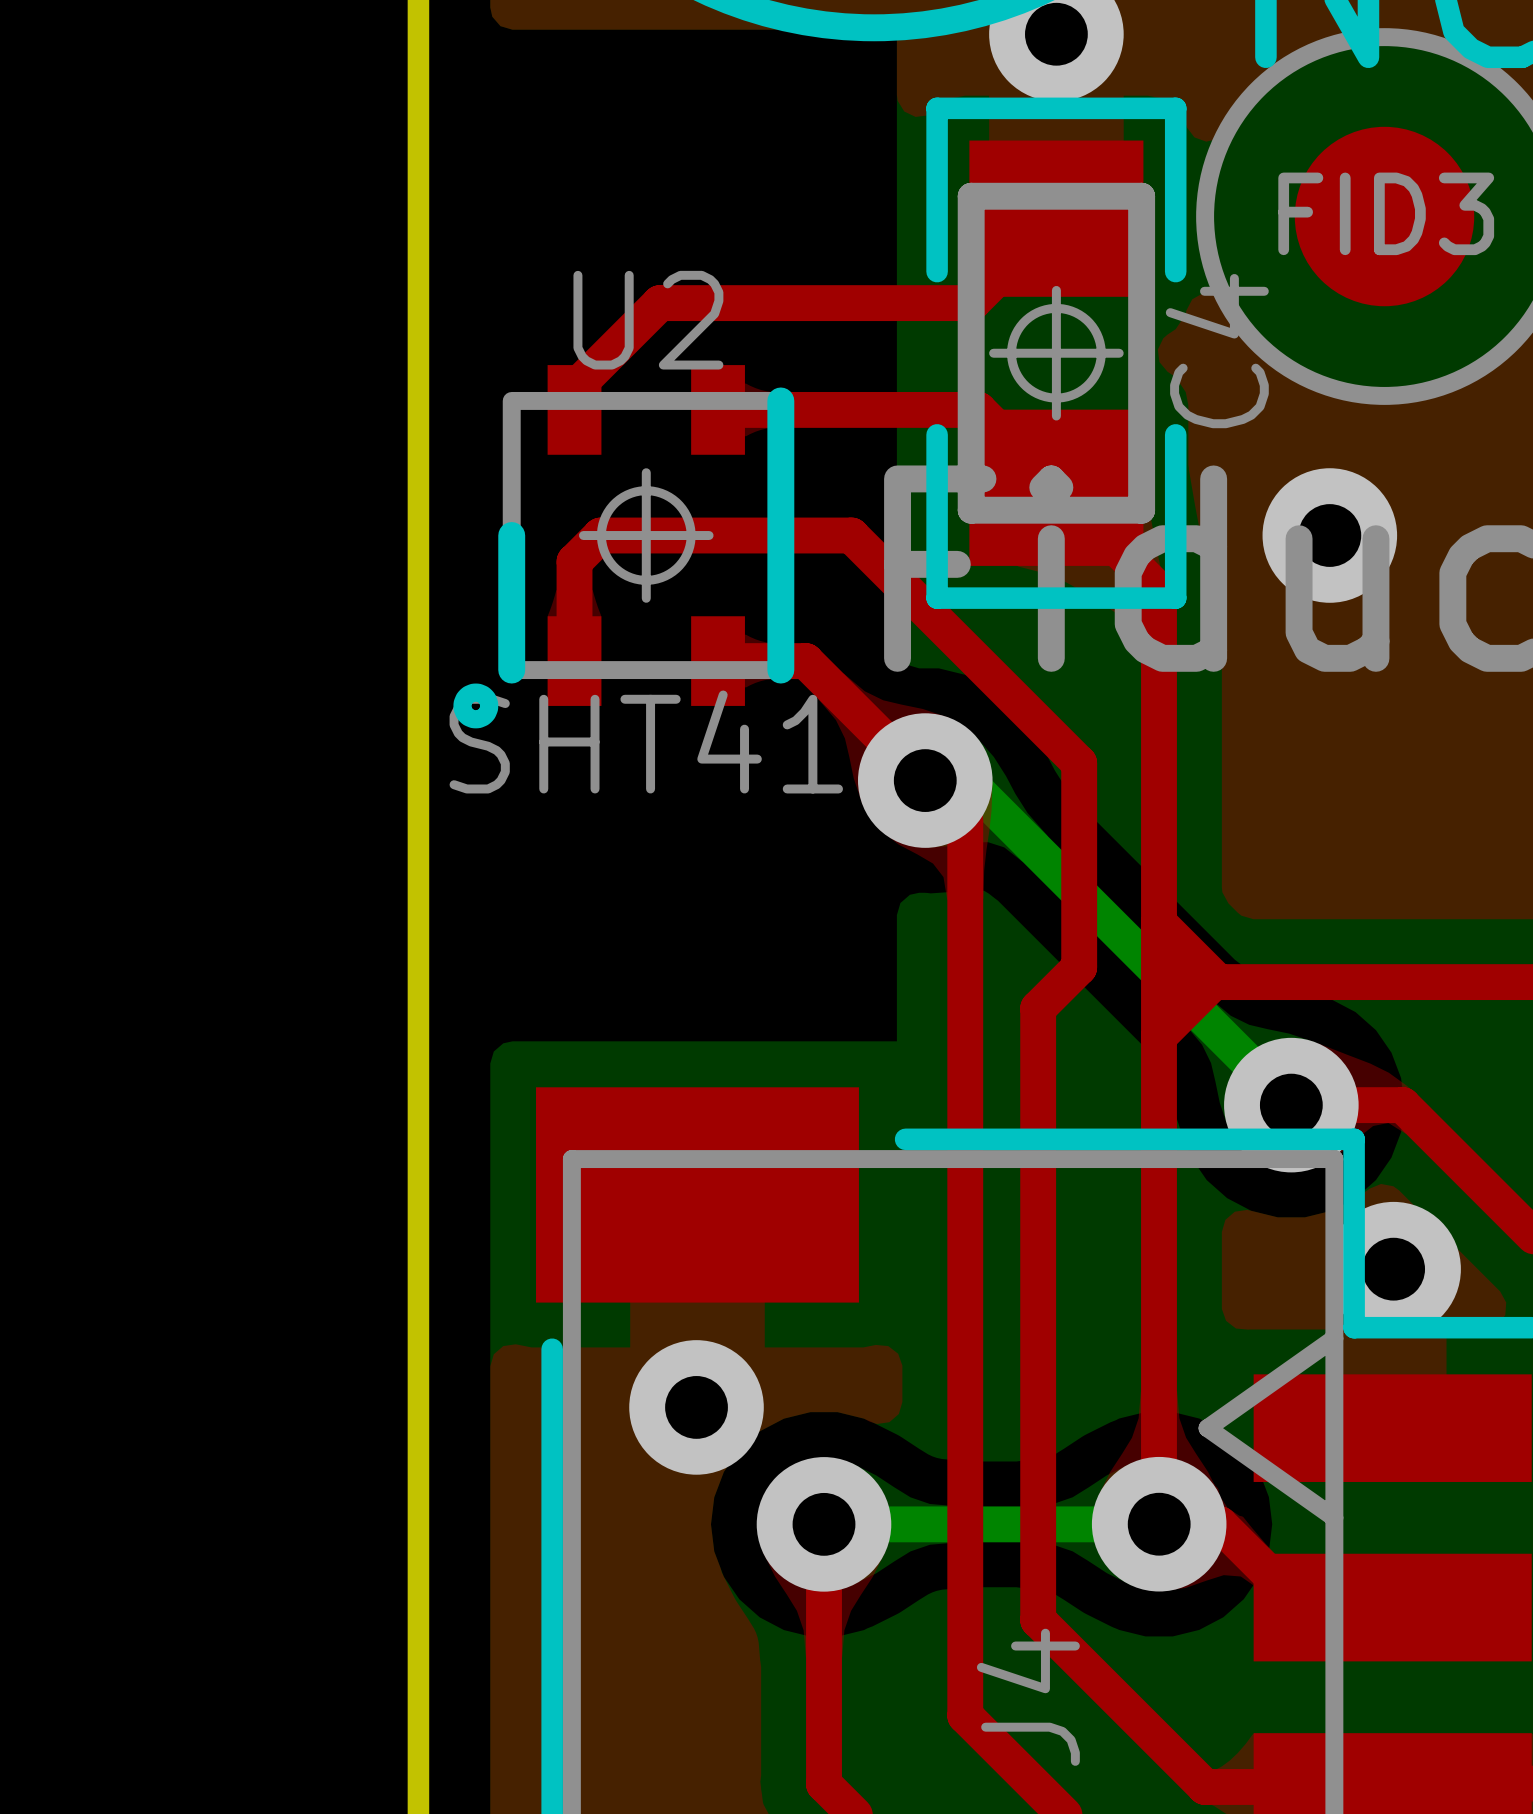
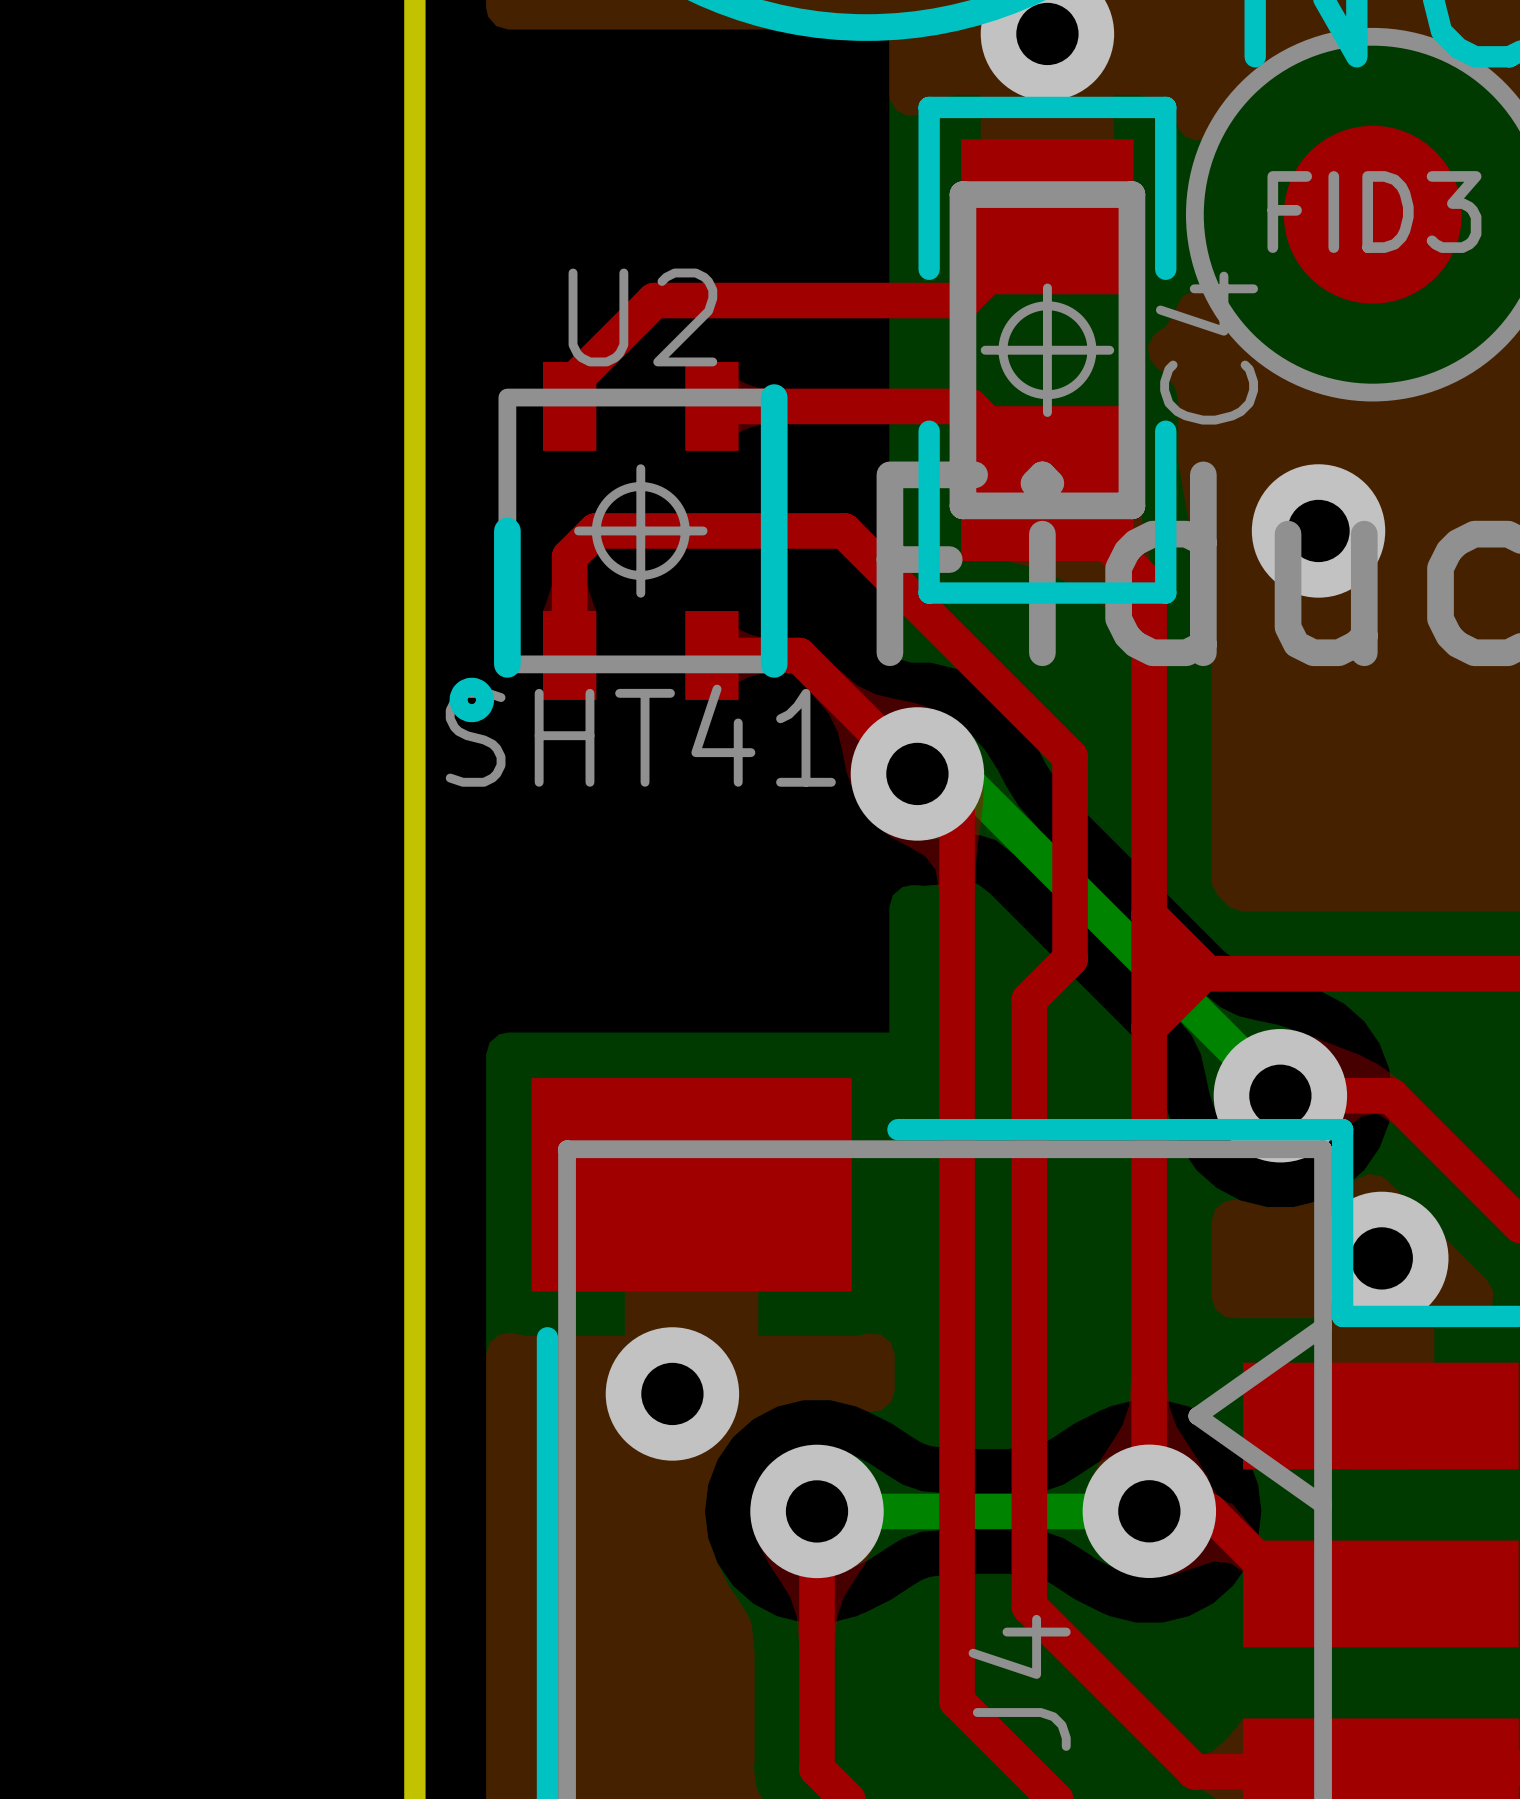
via position: (696, 1407) -> (672, 1393)

